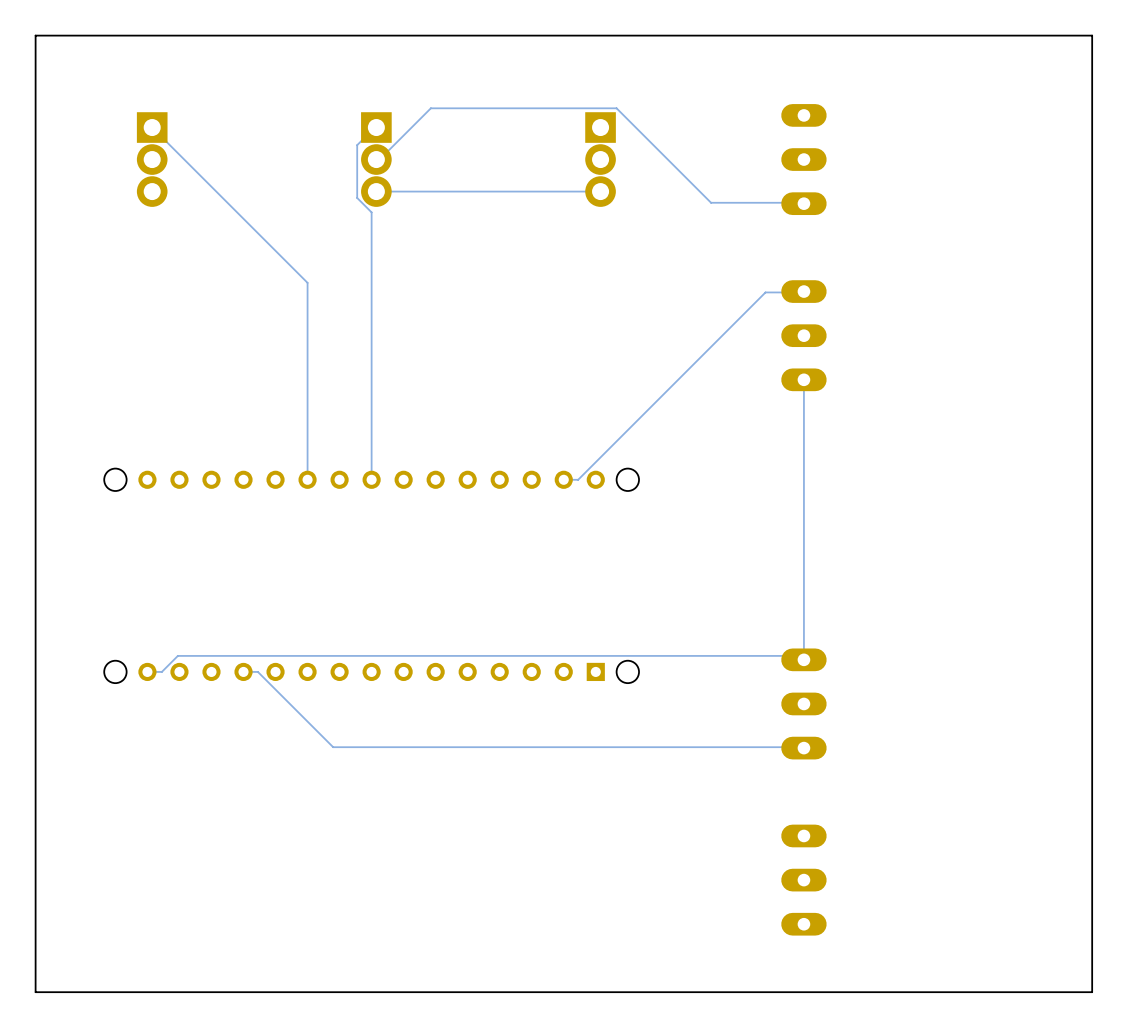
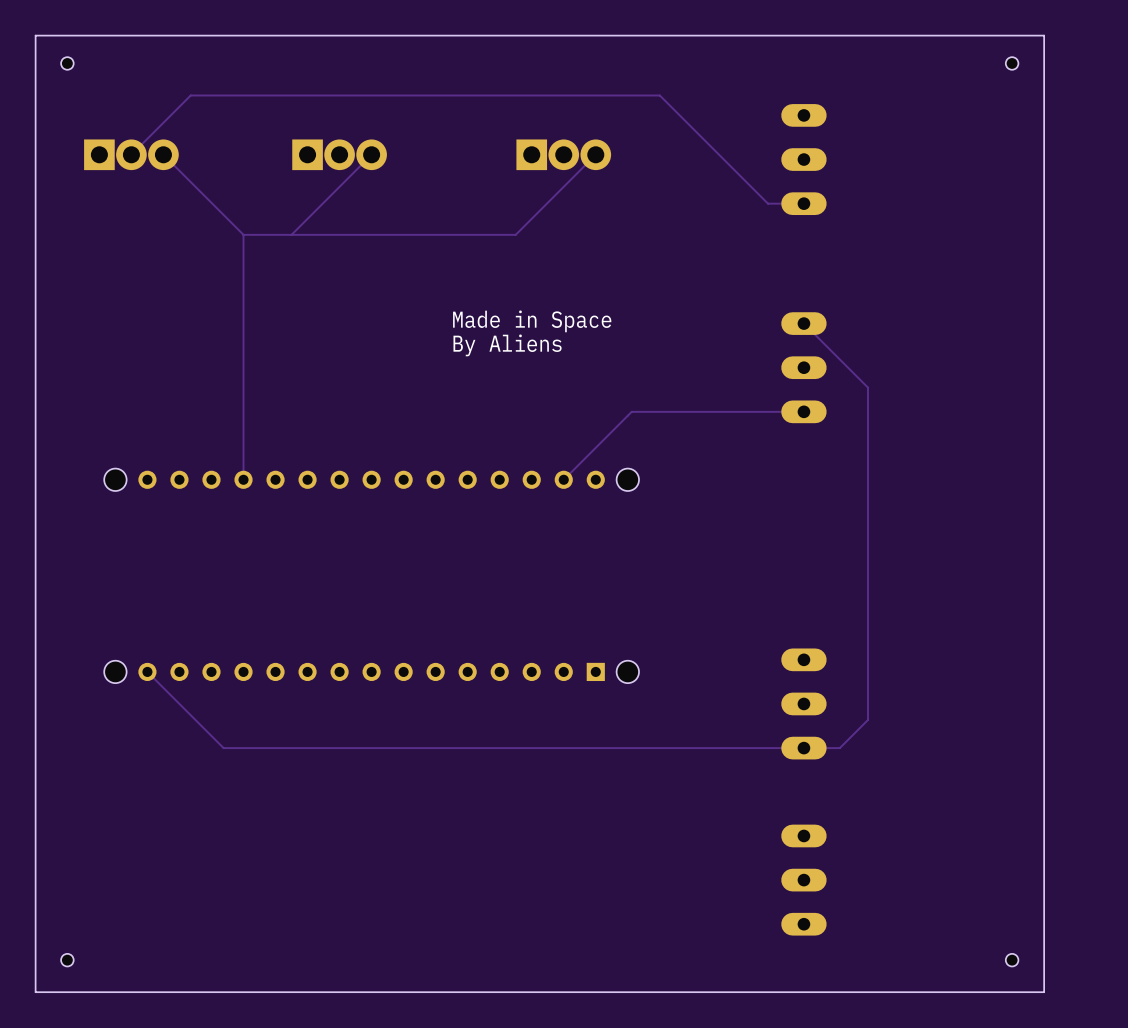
board edge: (1044, 35) (1092, 35) (1092, 992) (1044, 992) -> (1044, 35) (1044, 992)
hole: none -> (67, 63)
hole: none -> (1012, 63)
track: (152, 127) (307, 282) (307, 479) -> none
track: (376, 127) (357, 145) (357, 197) (371, 212) (371, 479) -> none
track: none -> (163, 154) (243, 234)
track: none -> (371, 154) (291, 234)
track: none -> (595, 154) (515, 234) (243, 234)
part rotation: 0° (152, 159) -> 90° counterclockwise (131, 154)
track: (376, 159) (379, 159) (430, 108) (616, 108) (711, 202) (803, 203) -> (131, 154) (190, 95) (659, 95) (768, 203) (803, 203)
part rotation: 0° (376, 159) -> 90° counterclockwise (339, 154)
part rotation: 0° (600, 159) -> 90° counterclockwise (563, 154)
track: (600, 191) (376, 191) -> none
track: none -> (243, 234) (243, 479)
track: (803, 291) (765, 292) (578, 479) (563, 479) -> (803, 411) (631, 411) (563, 479)
text: none -> Made in Space (532, 321)
part position: (803, 335) -> (803, 367)
text: none -> By Aliens (507, 345)
track: (803, 383) (801, 381) (803, 379) (803, 652) (800, 655) -> none
track: (800, 655) (177, 655) (161, 671) (147, 671) -> (803, 323) (867, 387) (867, 719) (839, 748) (223, 748) (147, 671)
track: (243, 671) (257, 671) (333, 747) (803, 748) -> none
hole: none -> (67, 960)
hole: none -> (1012, 960)

